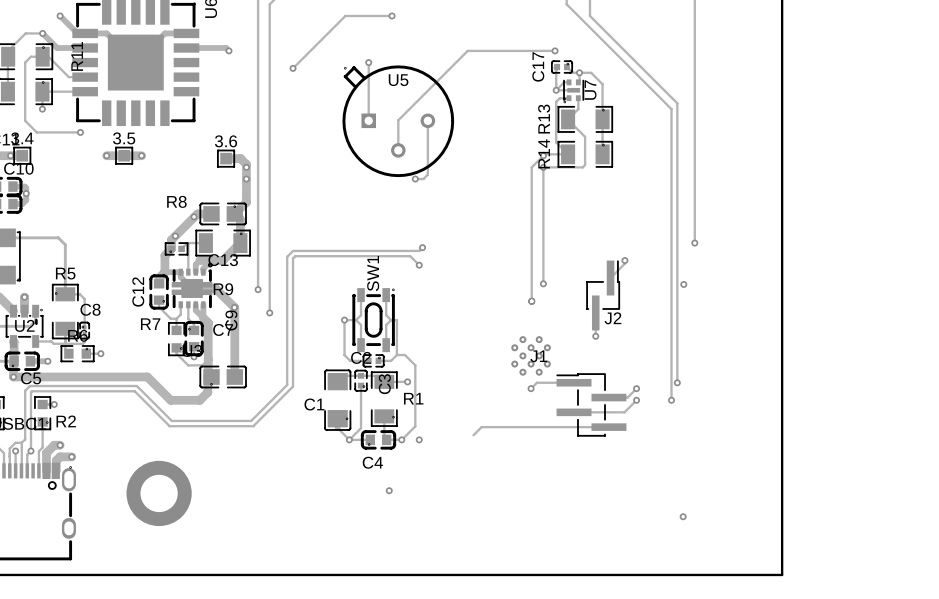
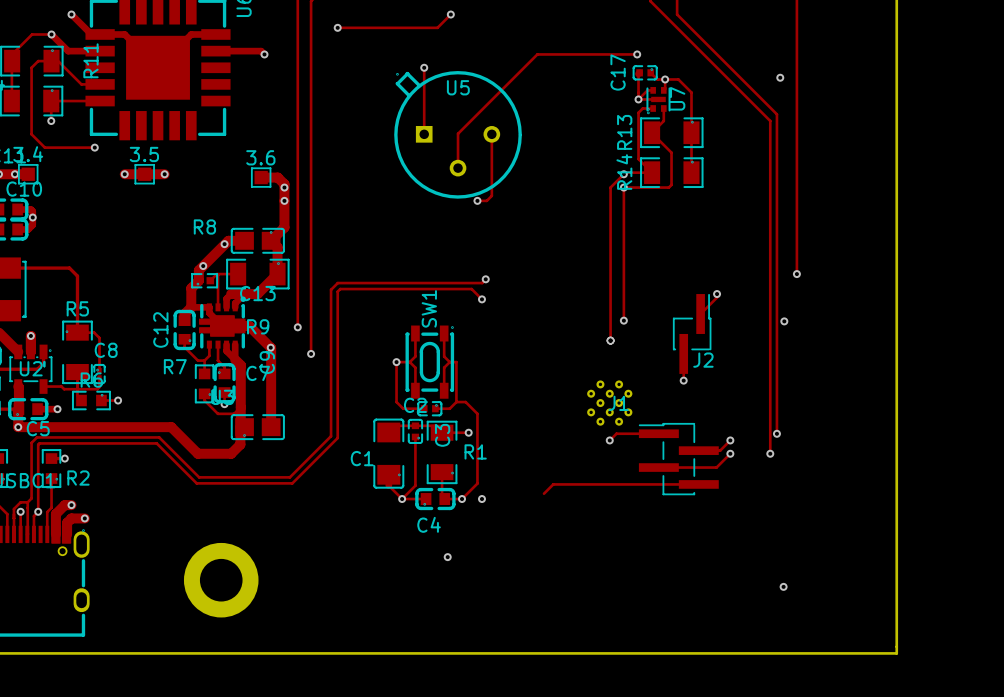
track: (392, 15) (345, 15) (293, 68) -> (450, 14) (437, 27) (337, 27)
via position: (293, 68) -> (337, 27)
via: none -> (780, 77)
part position: (159, 493) -> (221, 580)

